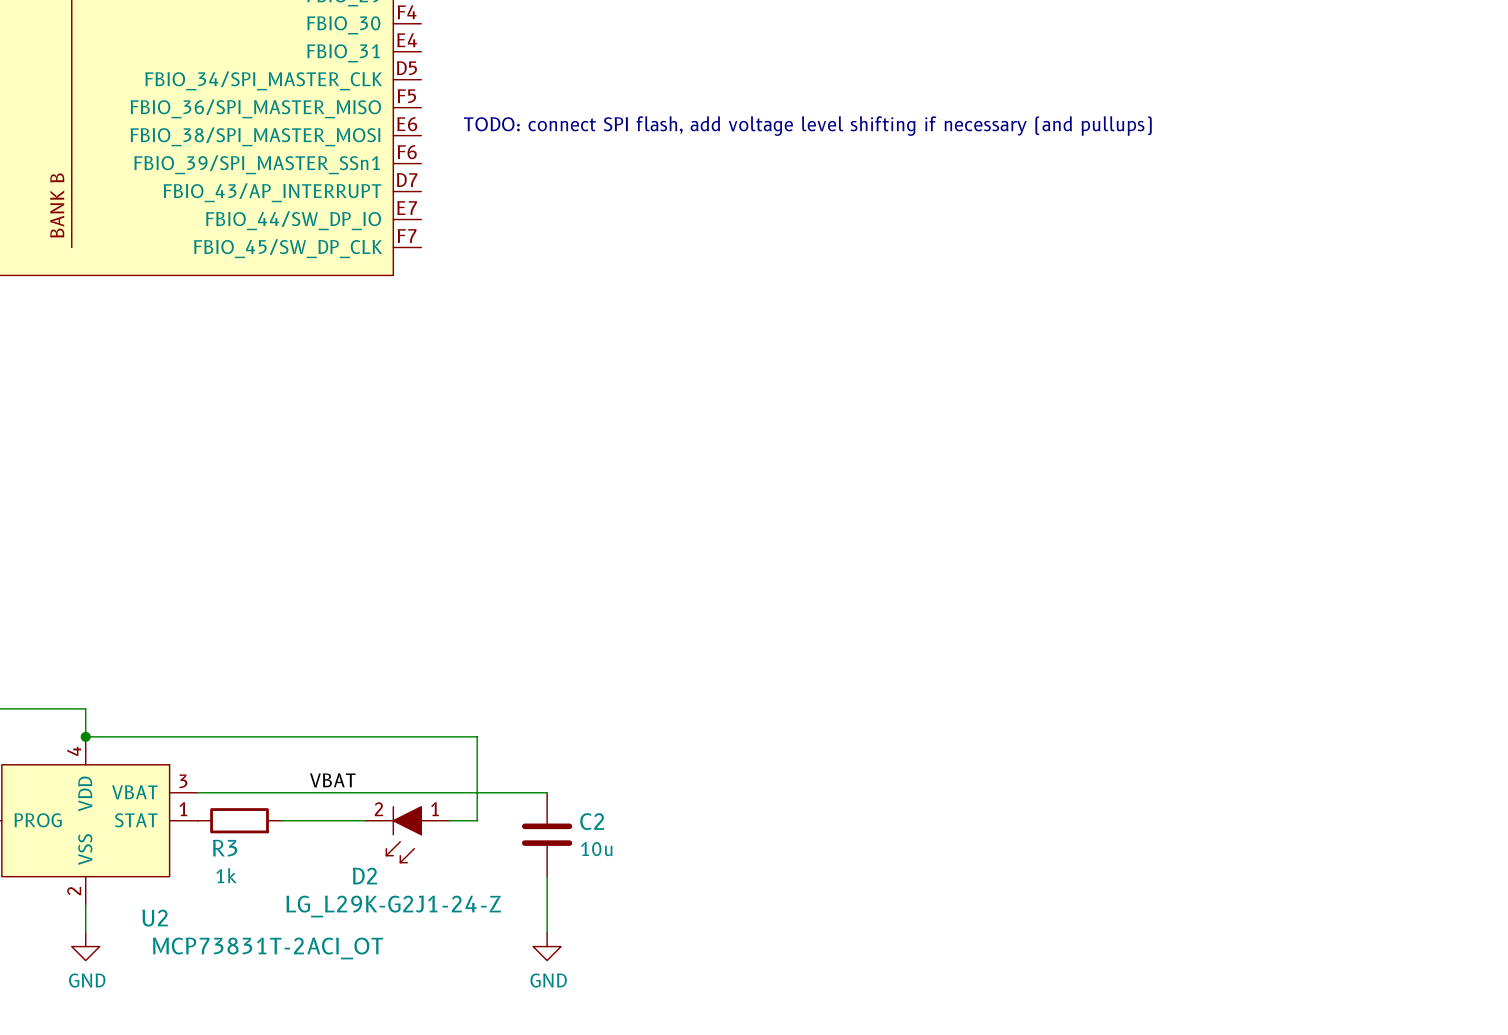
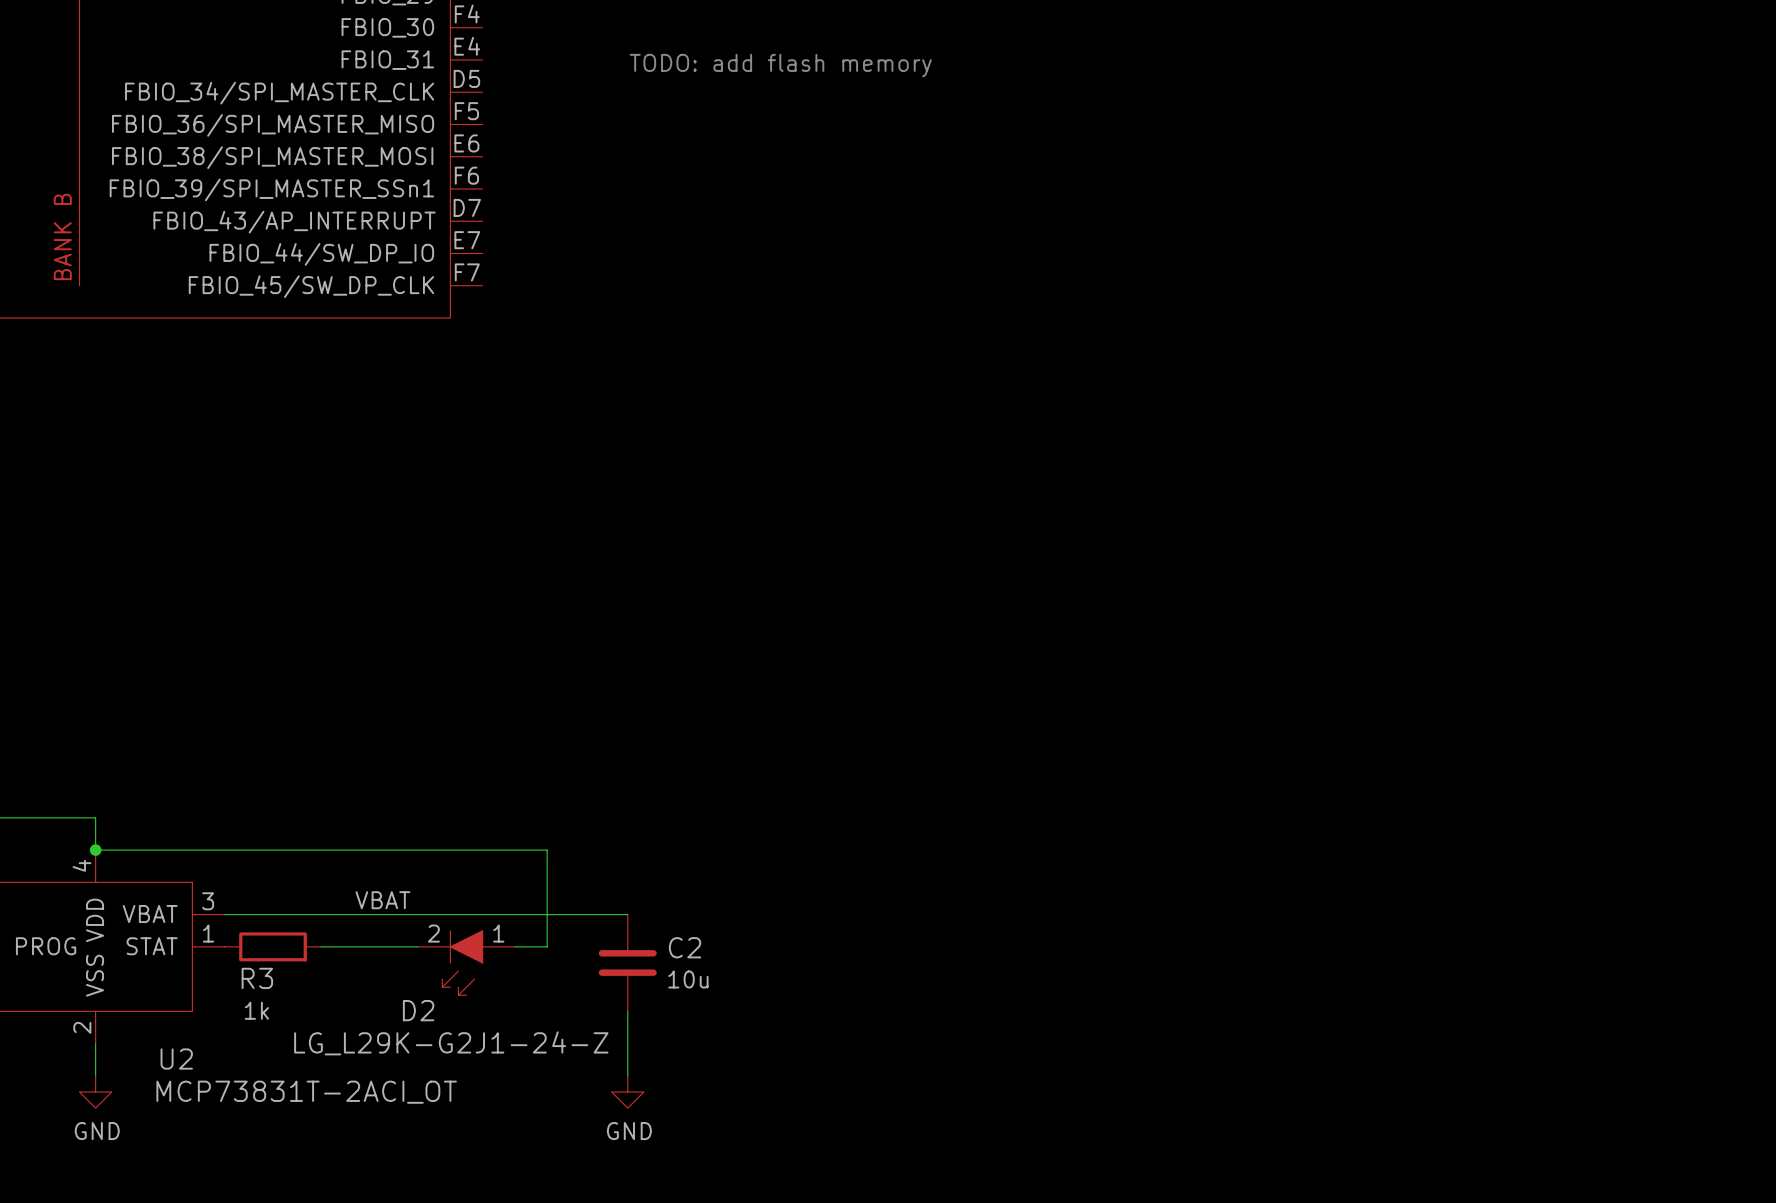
text: none -> TODO: add flash memory (780, 65)
text: TODO: connect SPI flash, add voltage level shifting if necessary (and pullups) (807, 126) -> none

